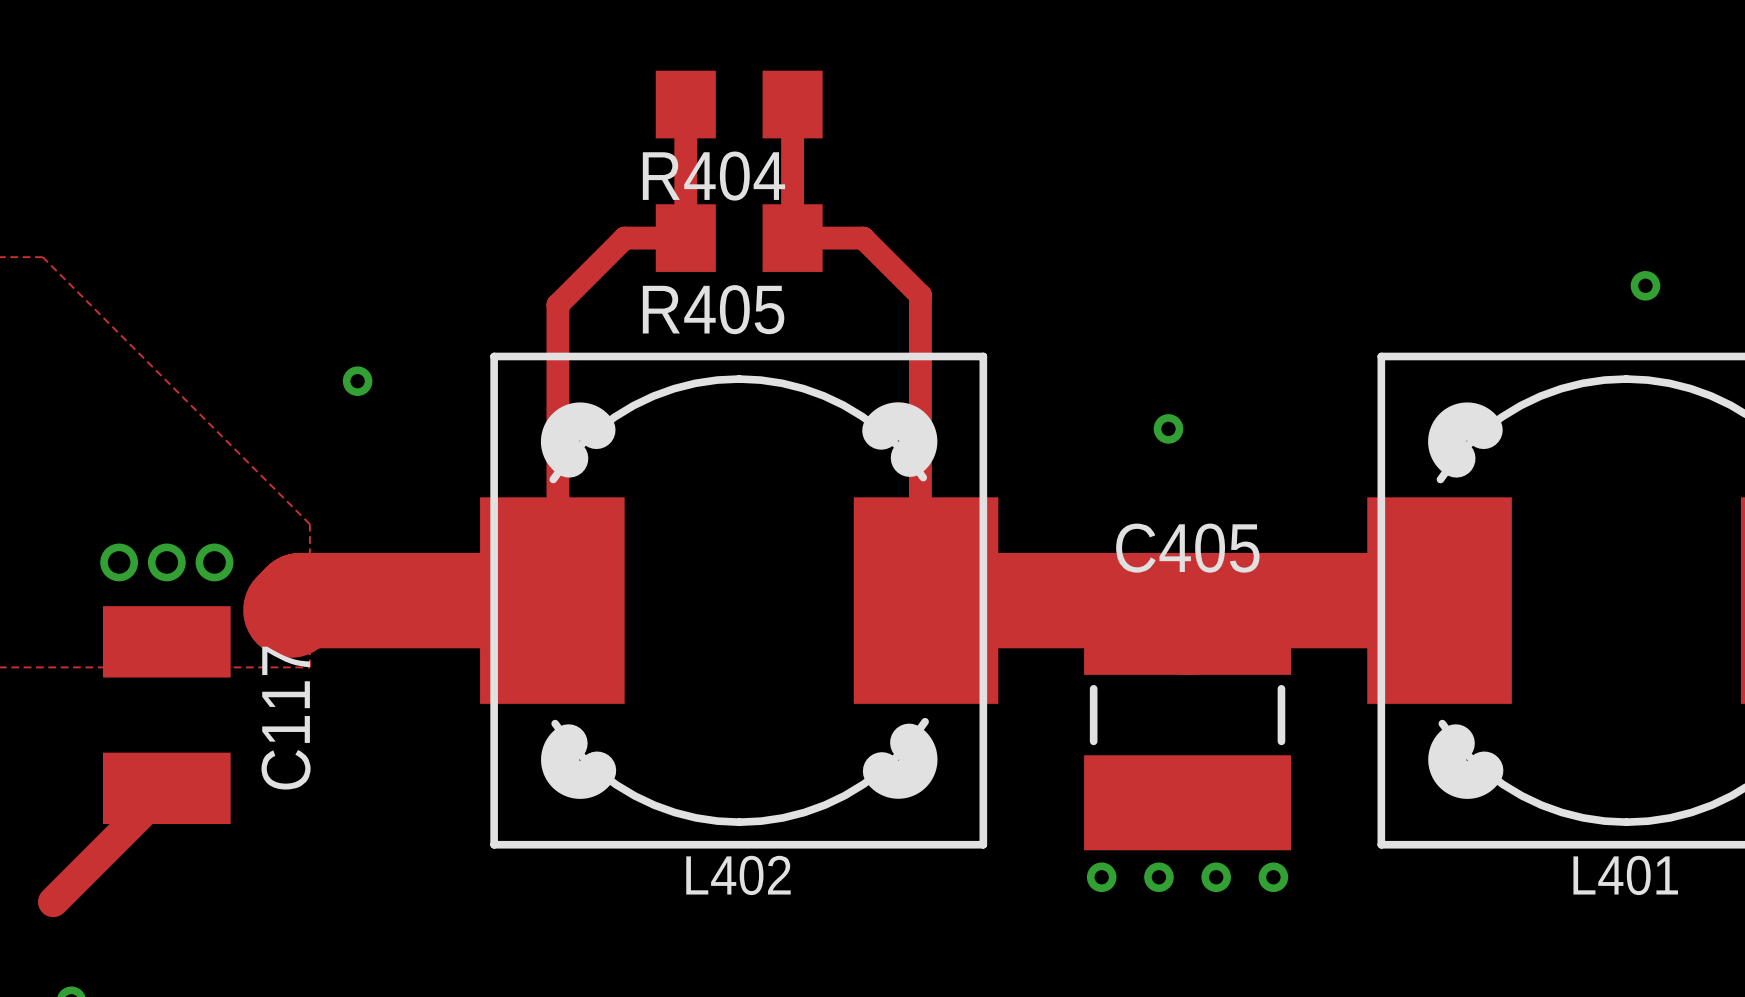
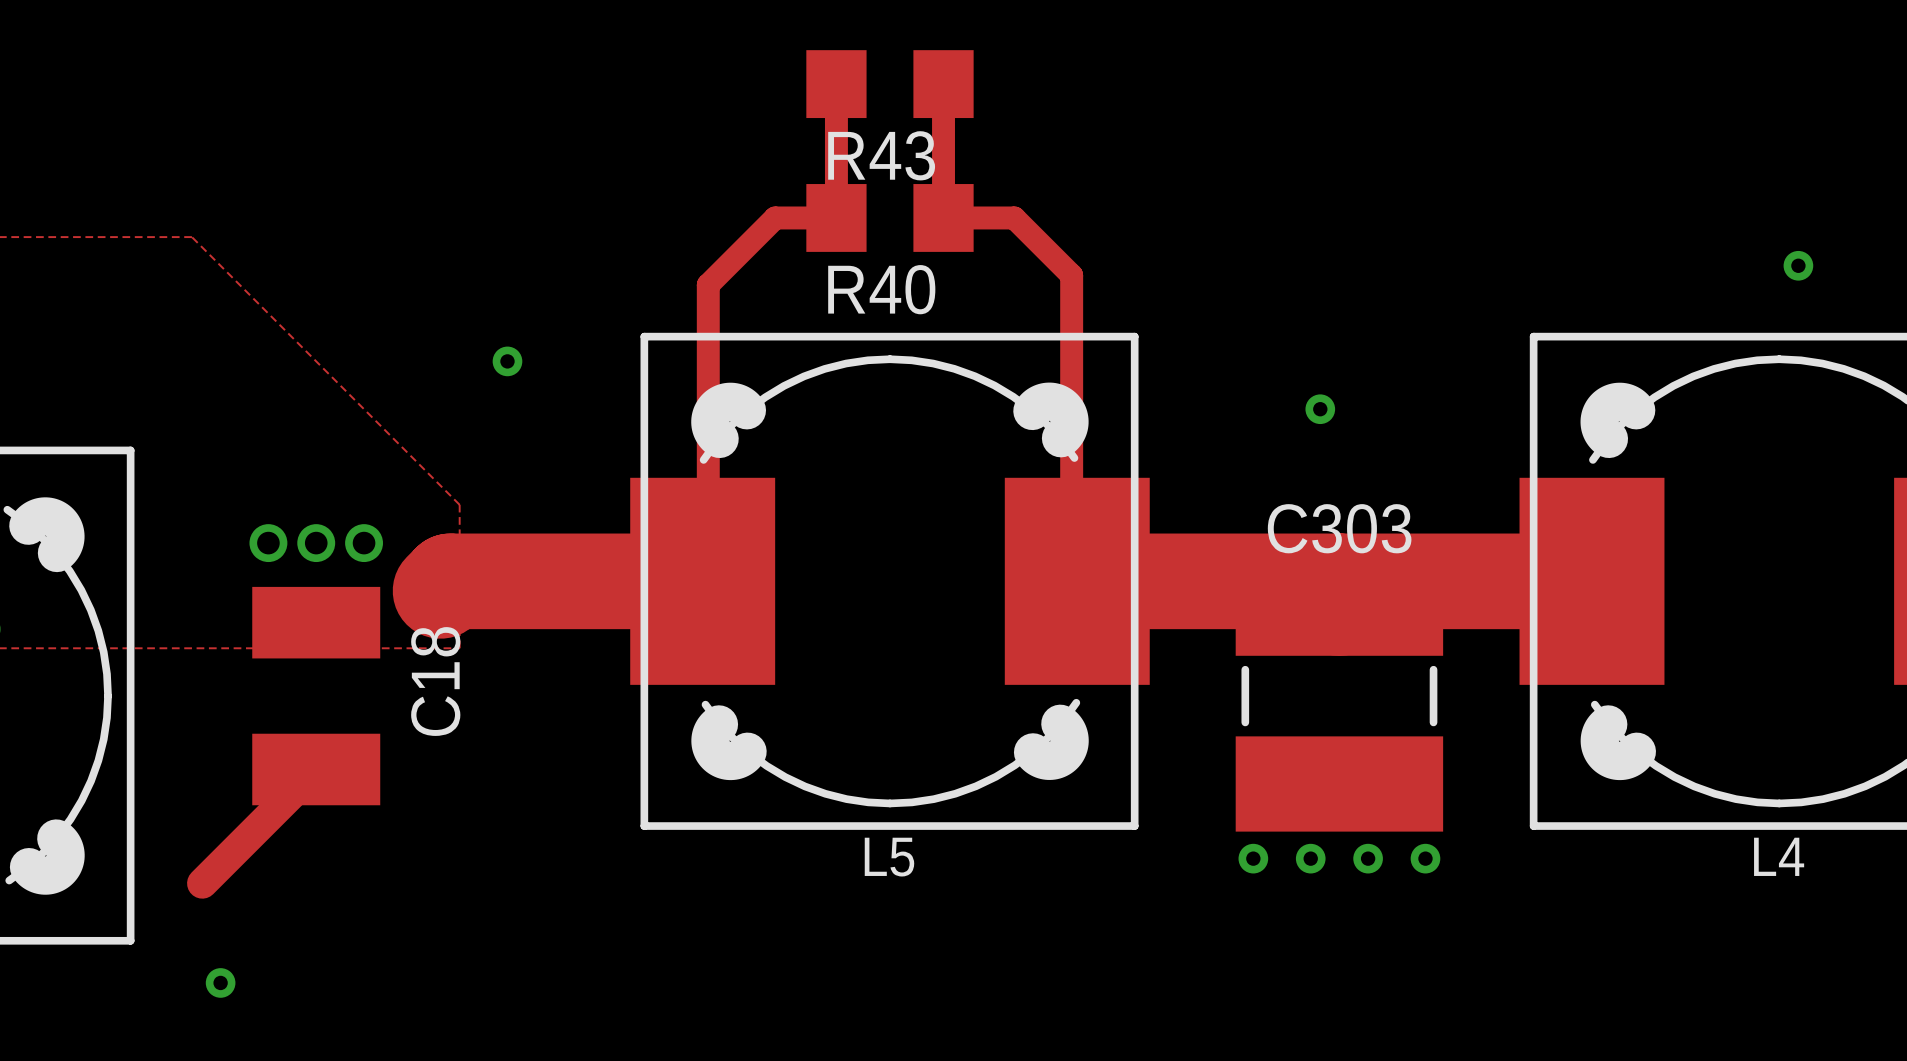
R404 name: R404 (713, 176) -> R43 (881, 155)
R405 name: R405 (713, 309) -> R40 (881, 289)
C405 name: C405 (1187, 548) -> C303 (1339, 528)
C117 name: C117 (286, 718) -> C18 (435, 681)
L402 name: L402 (738, 875) -> L5 (889, 857)
L401 name: L401 (1625, 875) -> L4 (1779, 856)

